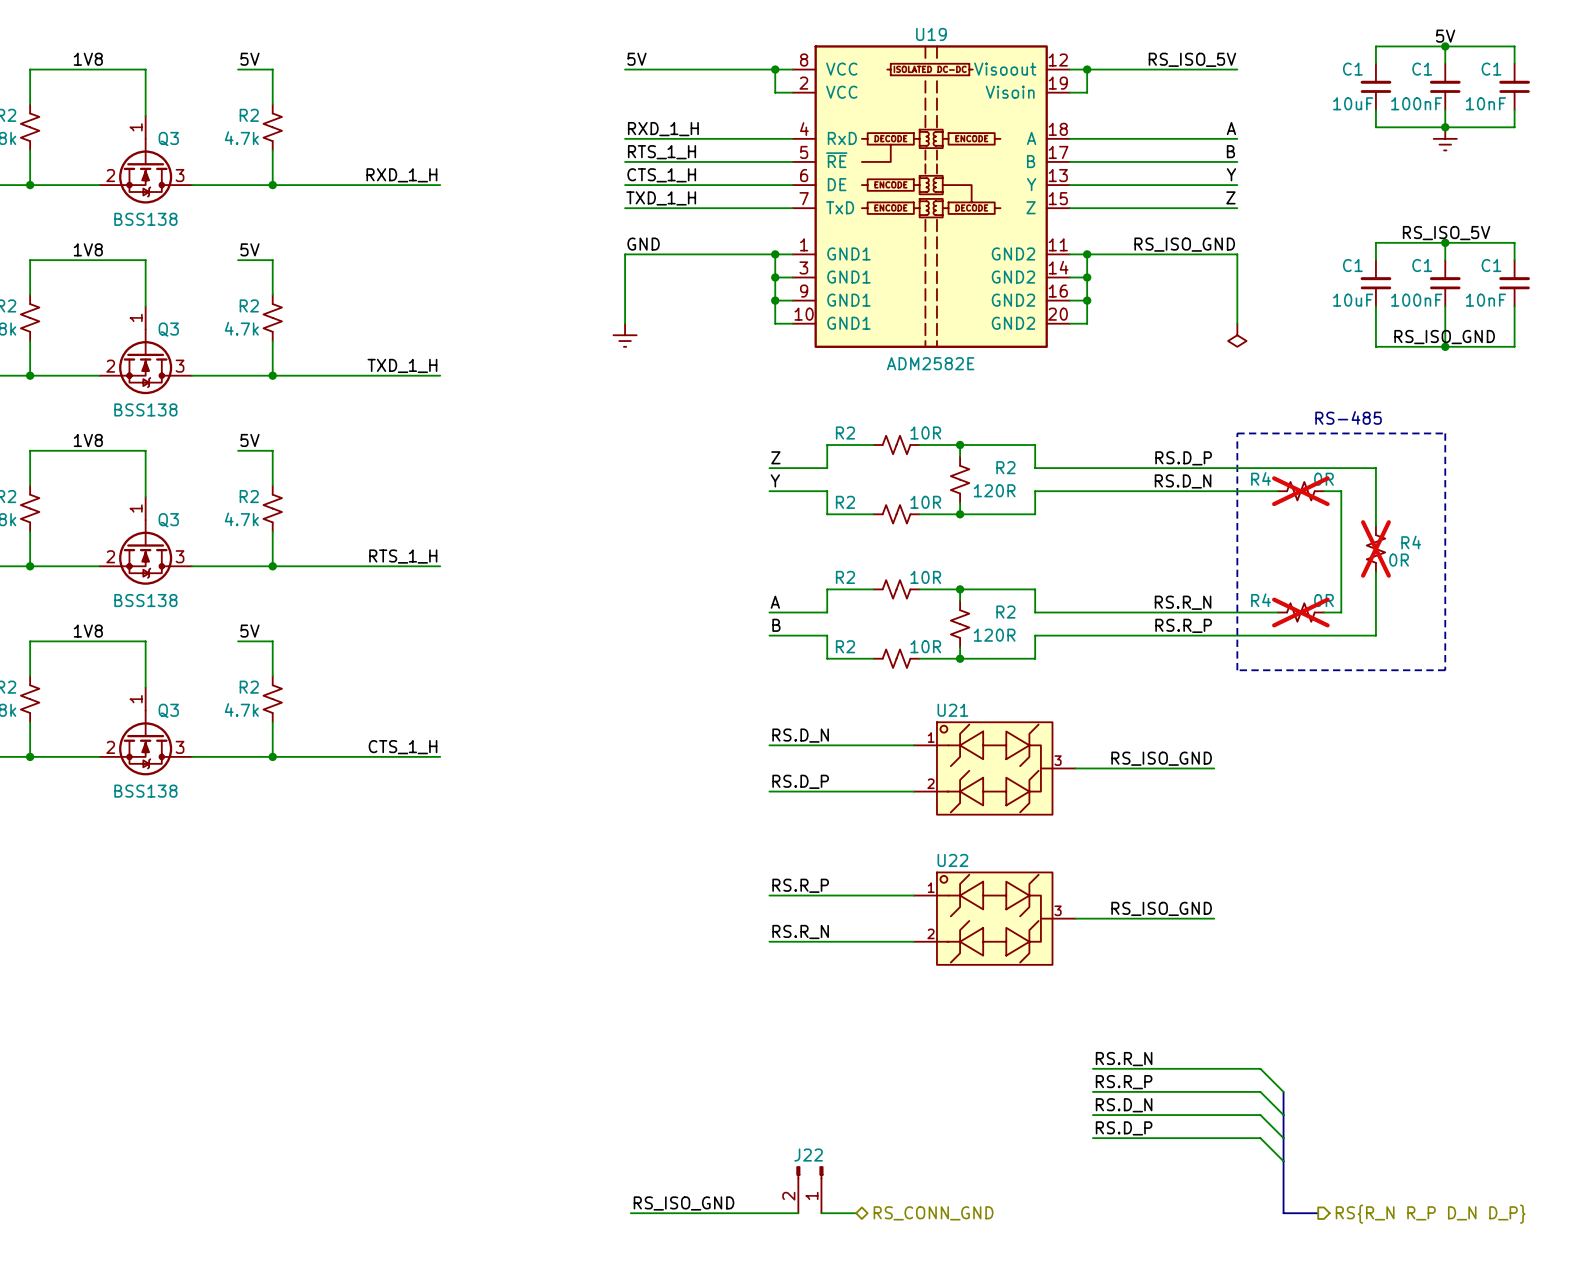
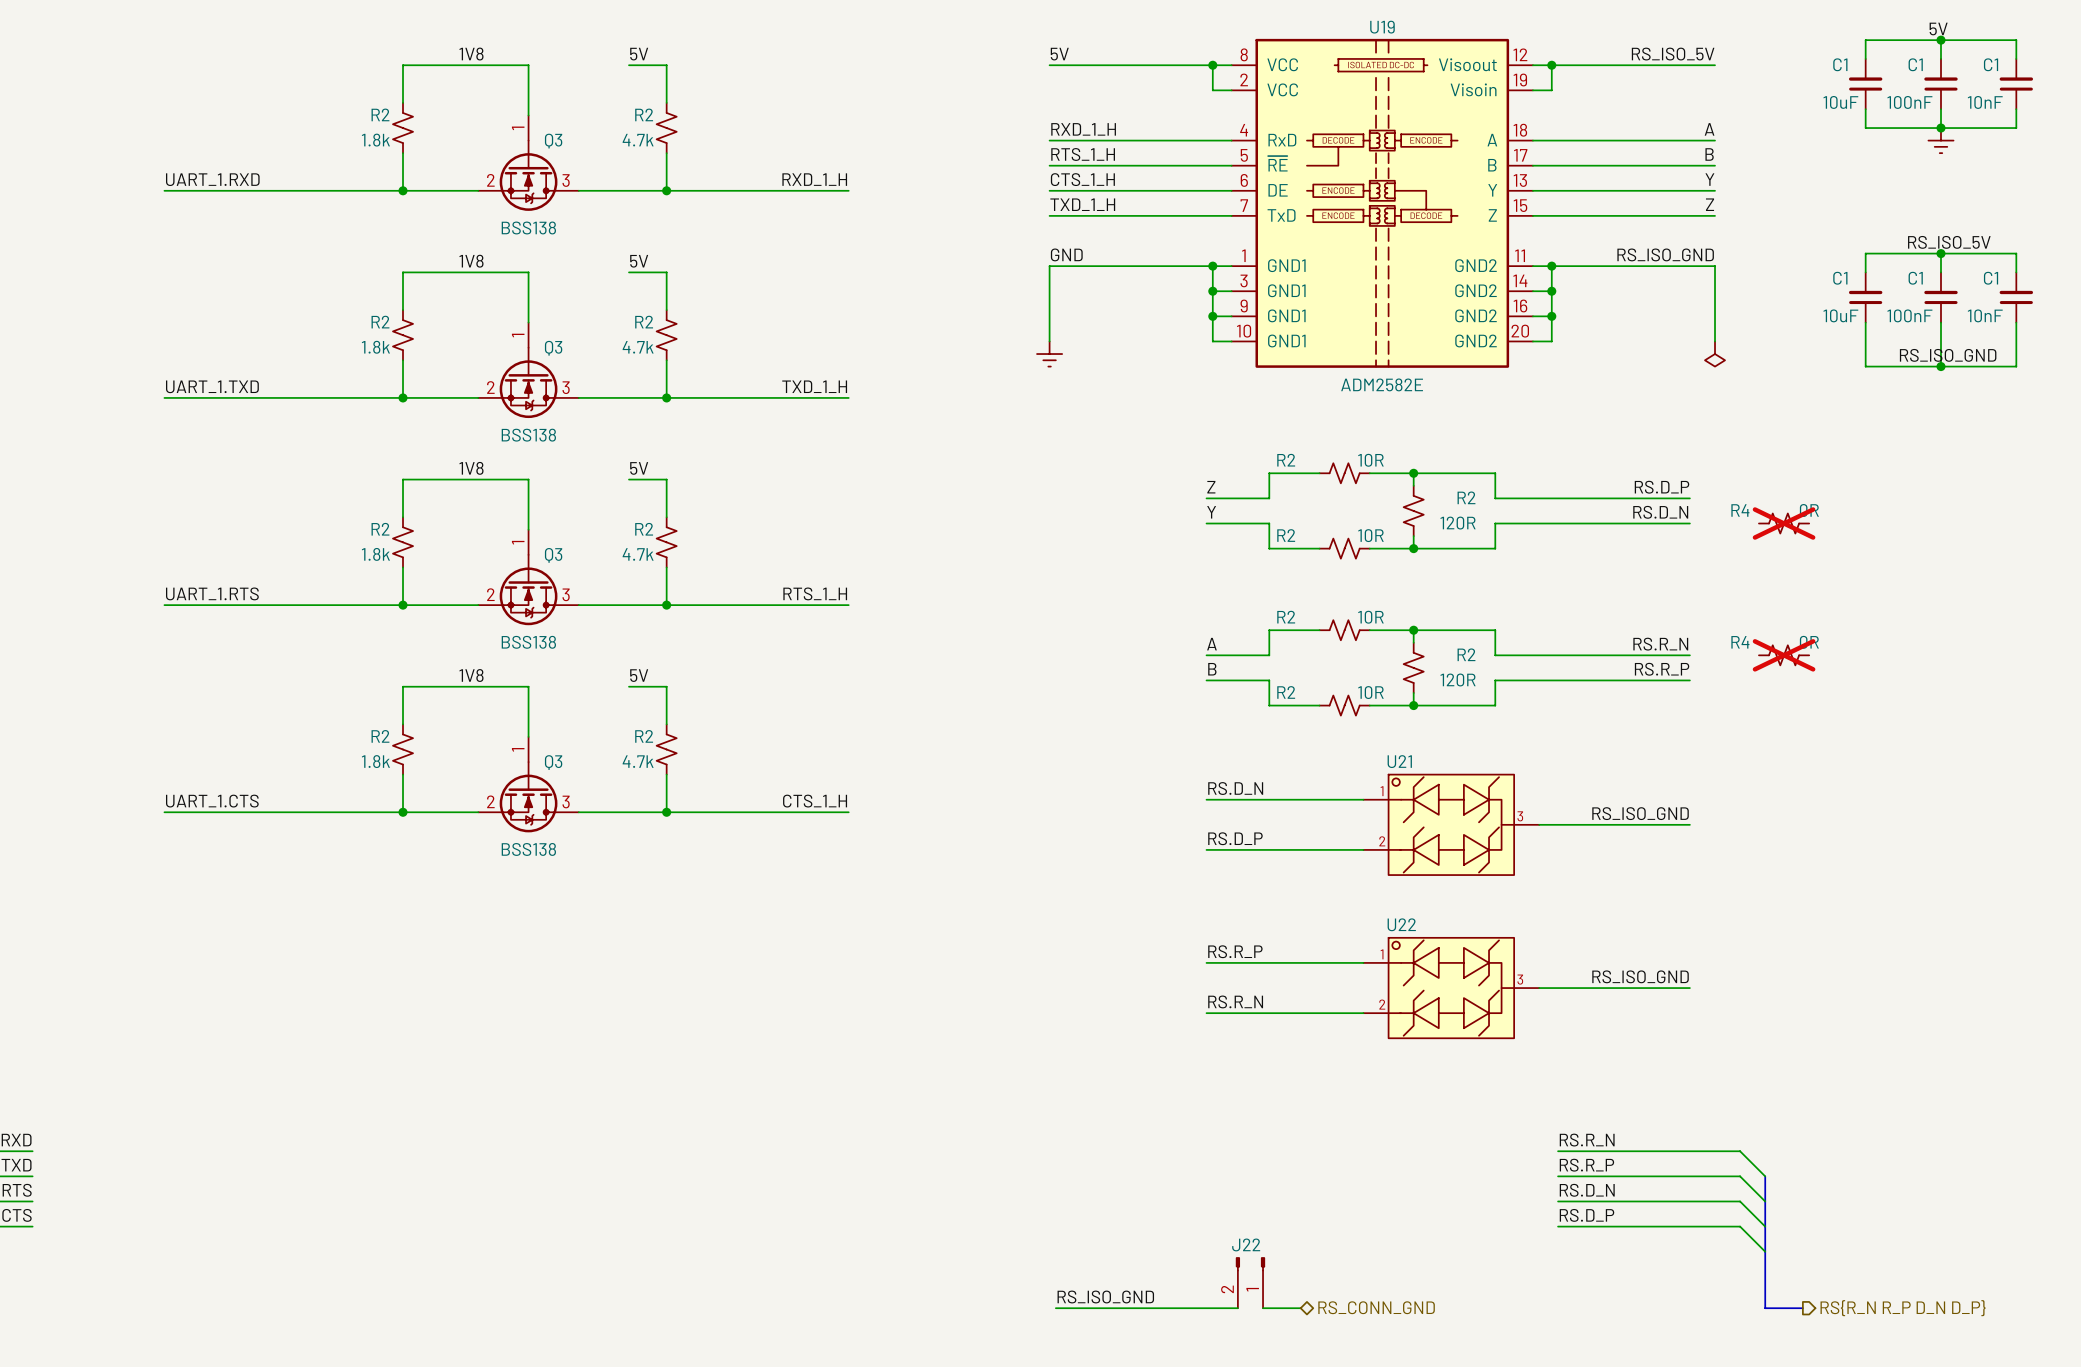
text: RS-485 (1348, 417) -> none
line: (1237, 433) (1445, 433) (1445, 670) (1237, 670) (1237, 433) -> none
wire: (1214, 468) (1375, 468) (1375, 525) -> none
wire: (1214, 491) (1277, 491) -> none
wire: (1323, 491) (1341, 491) (1341, 612) (1323, 612) -> none
R4: 0R (1375, 548) -> none
wire: (1375, 572) (1375, 635) (1214, 635) -> none
wire: (1214, 612) (1277, 612) -> none

